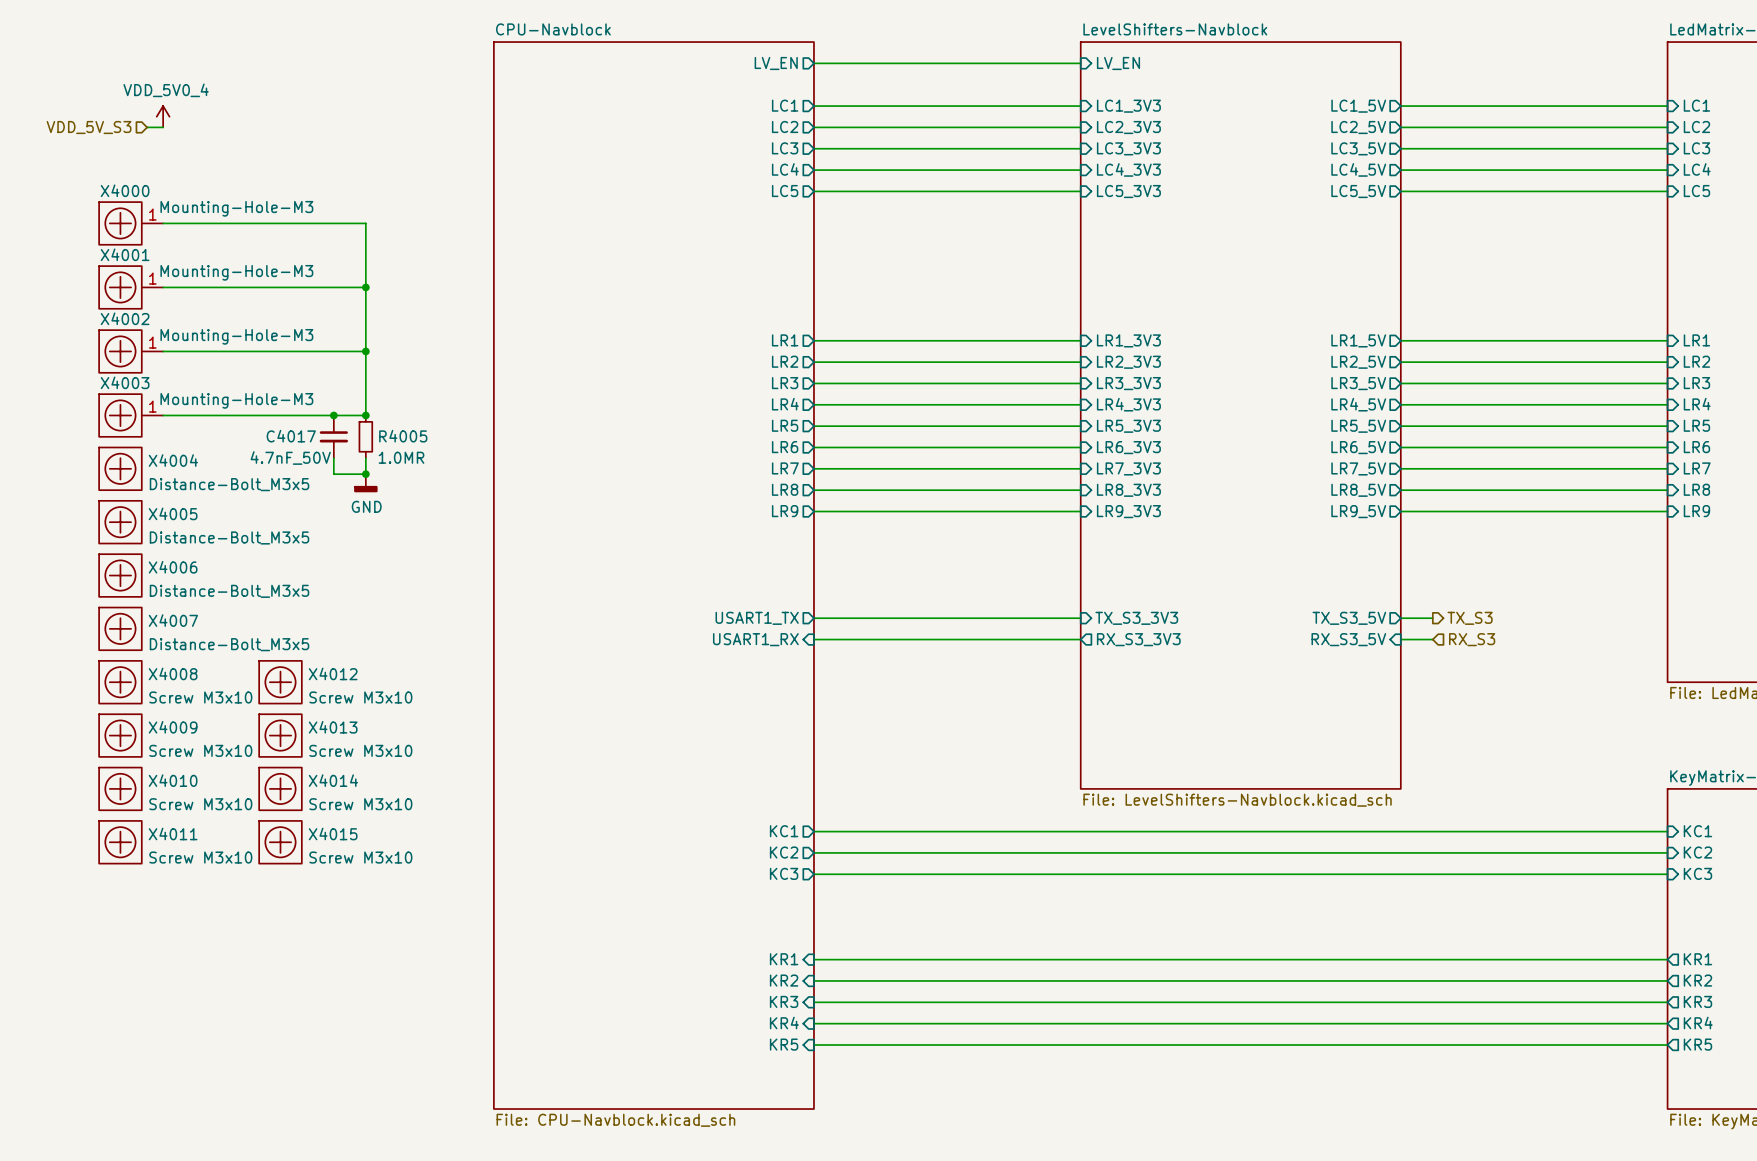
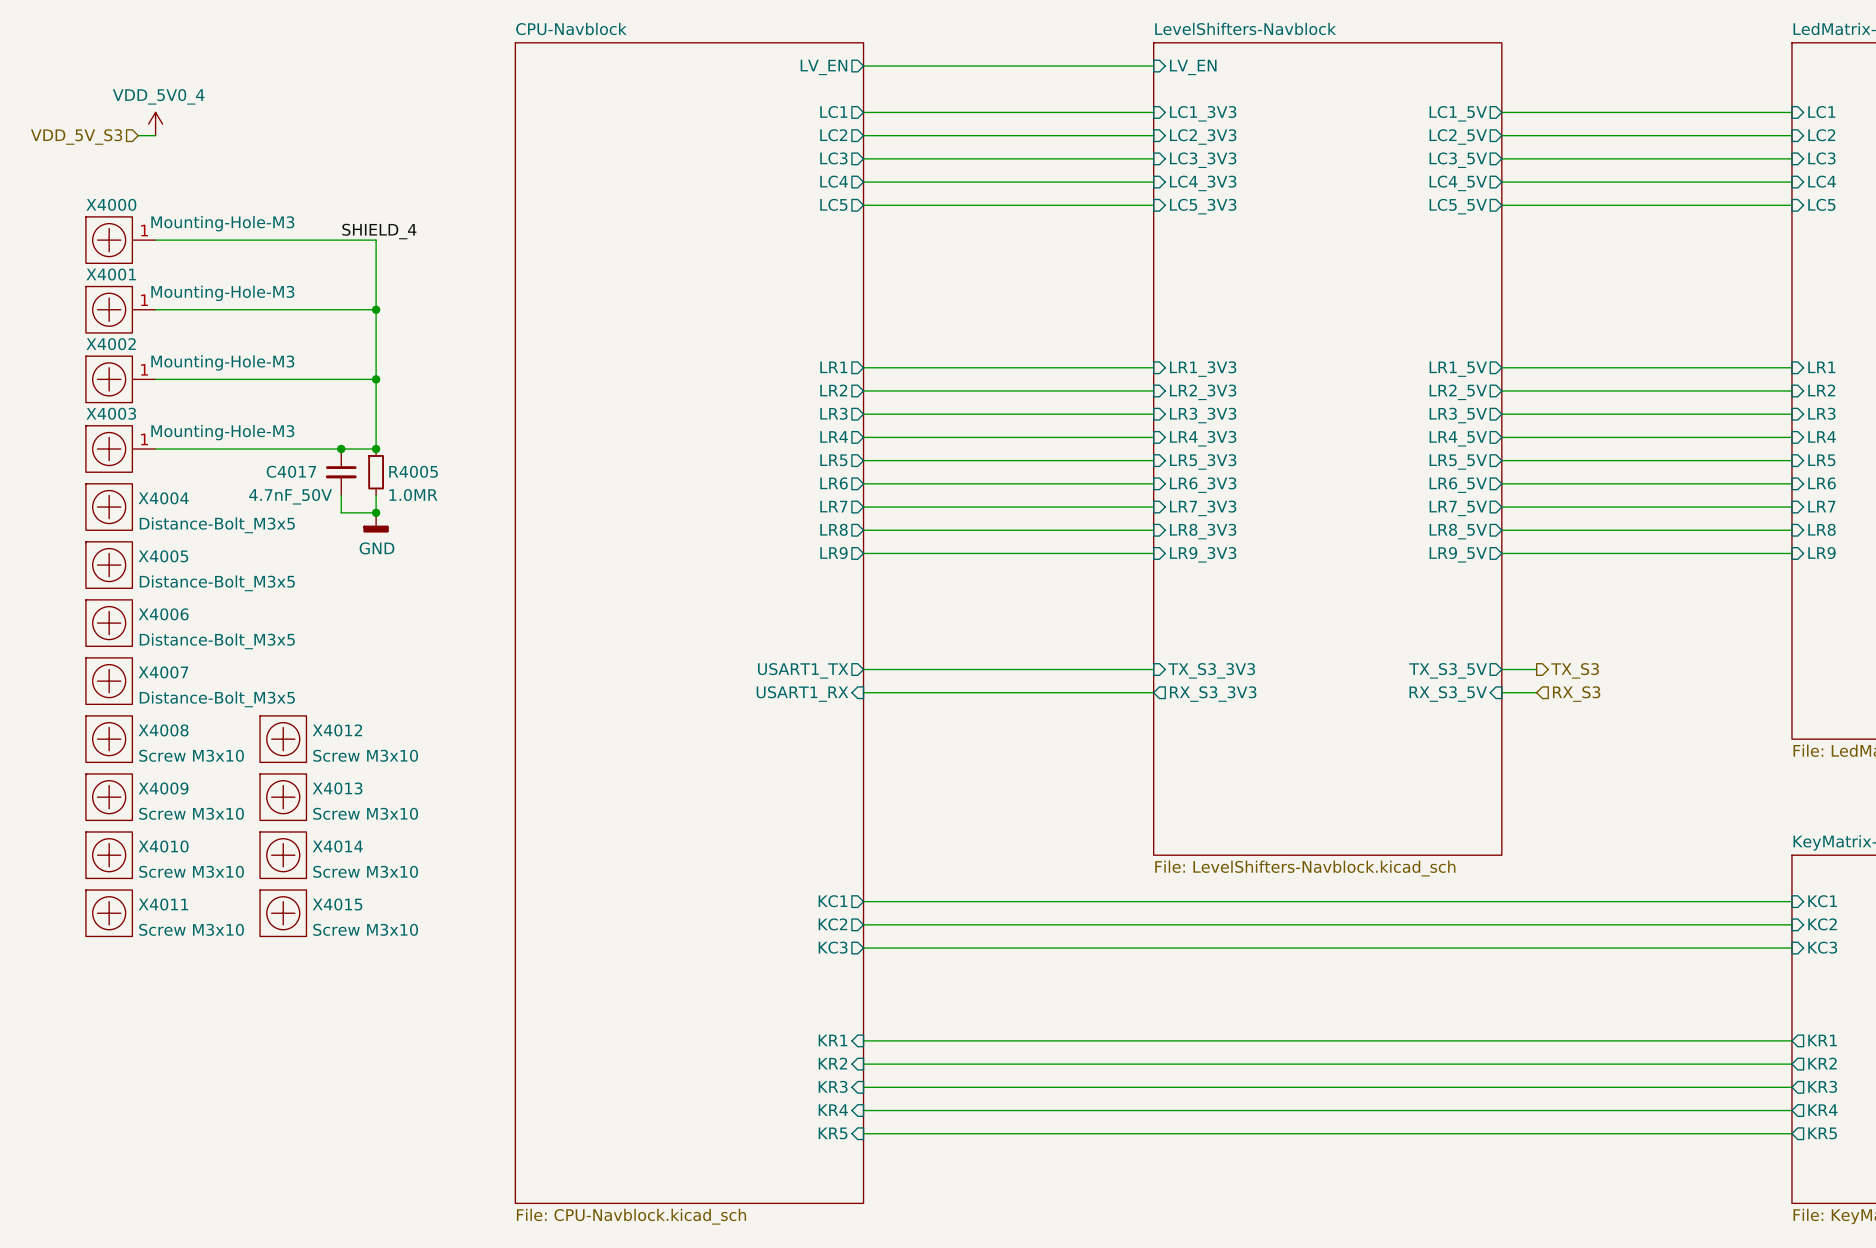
label: none -> SHIELD_4 (379, 231)

